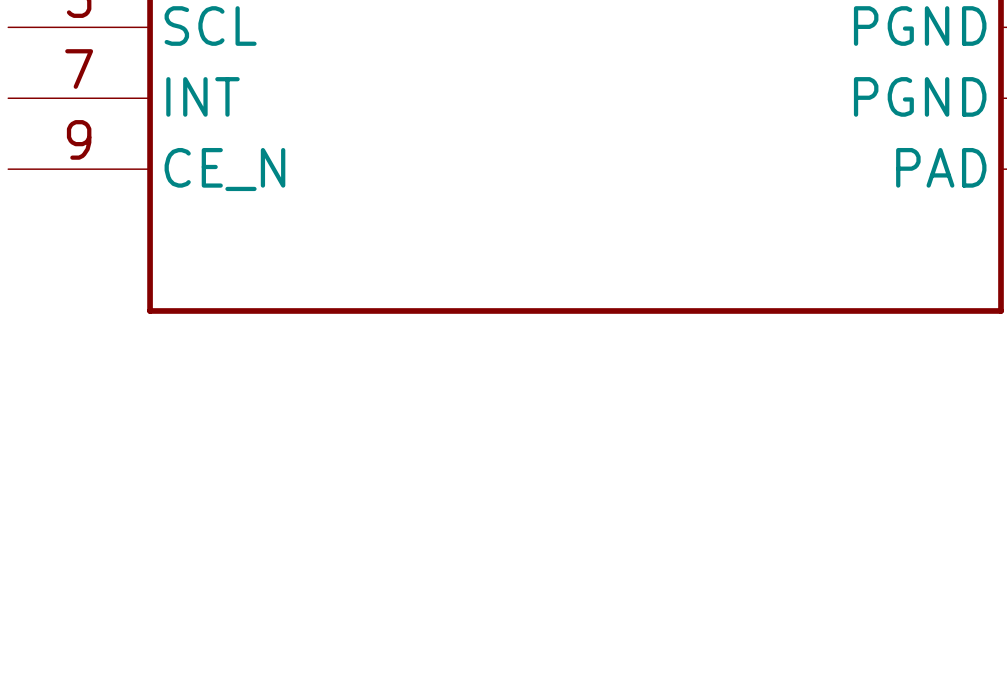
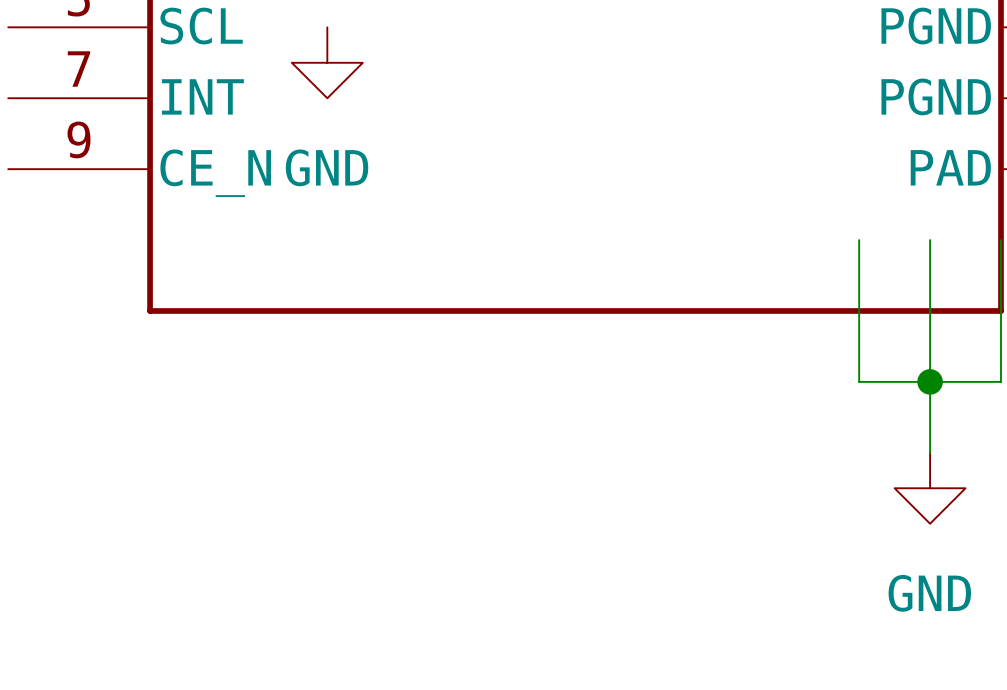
power symbol: none -> GND (327, 62)
wire: none -> (859, 240) (859, 381) (1001, 381) (1001, 240)
wire: none -> (930, 240) (930, 452)
junction: none -> (930, 381)
power symbol: none -> GND (930, 488)

